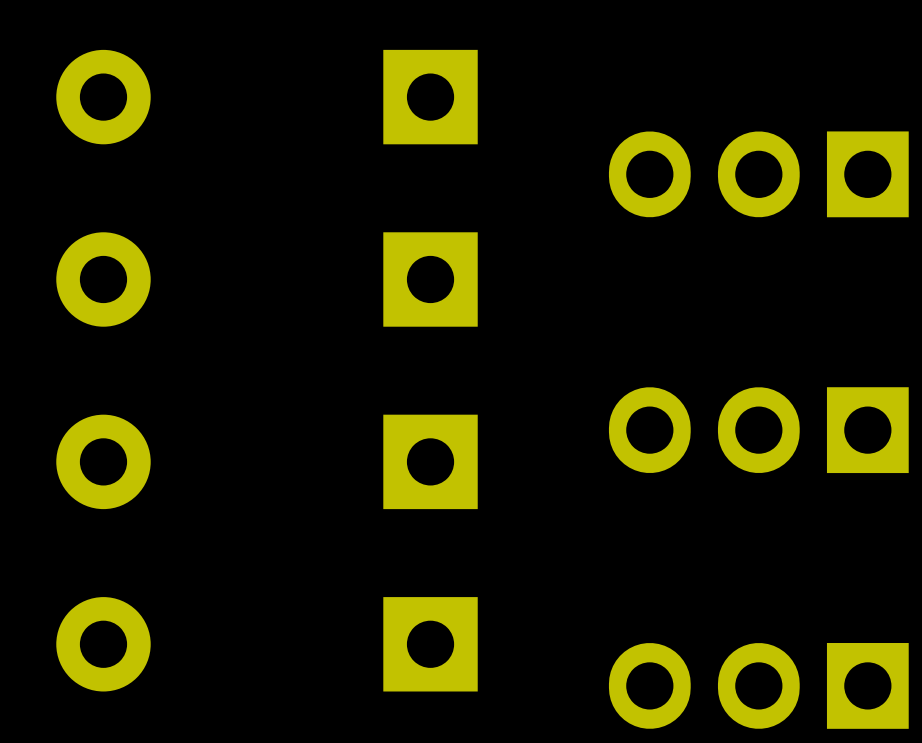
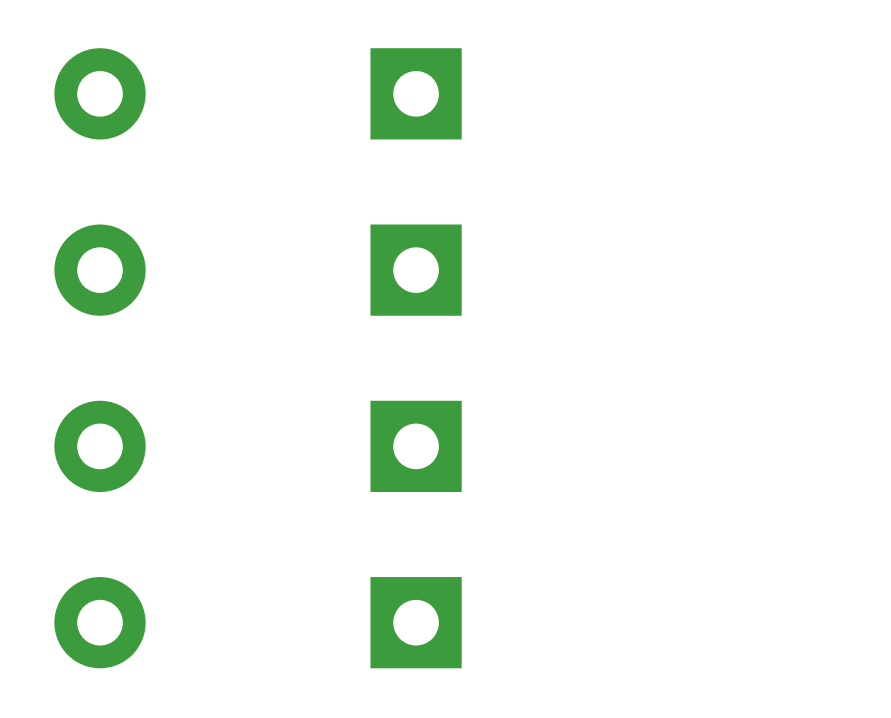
part: (758, 174) -> none
part: (758, 430) -> none
part: (758, 685) -> none

